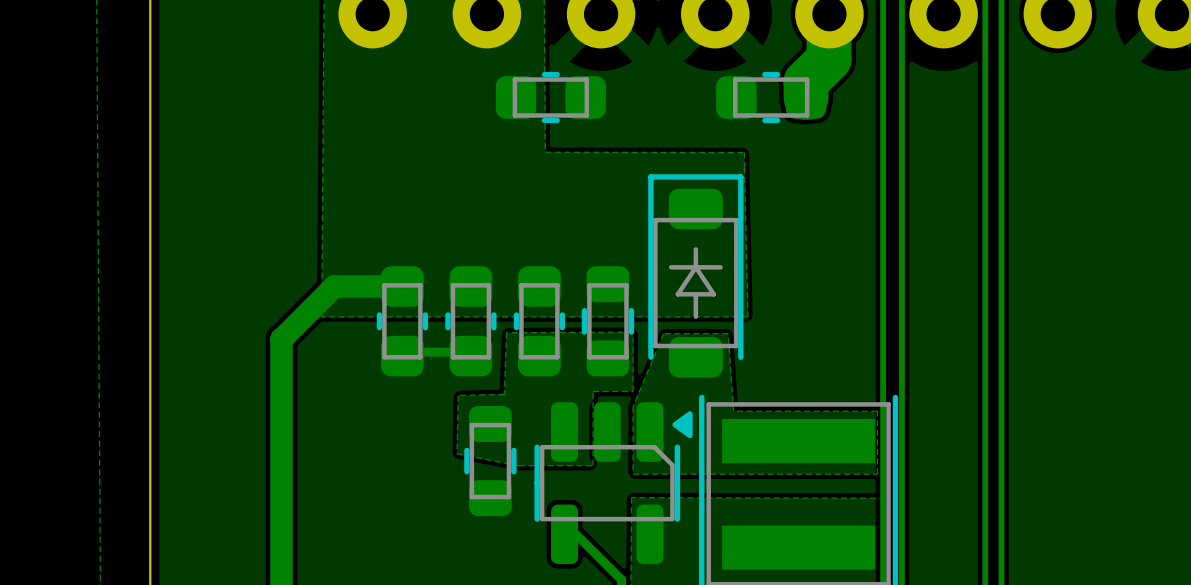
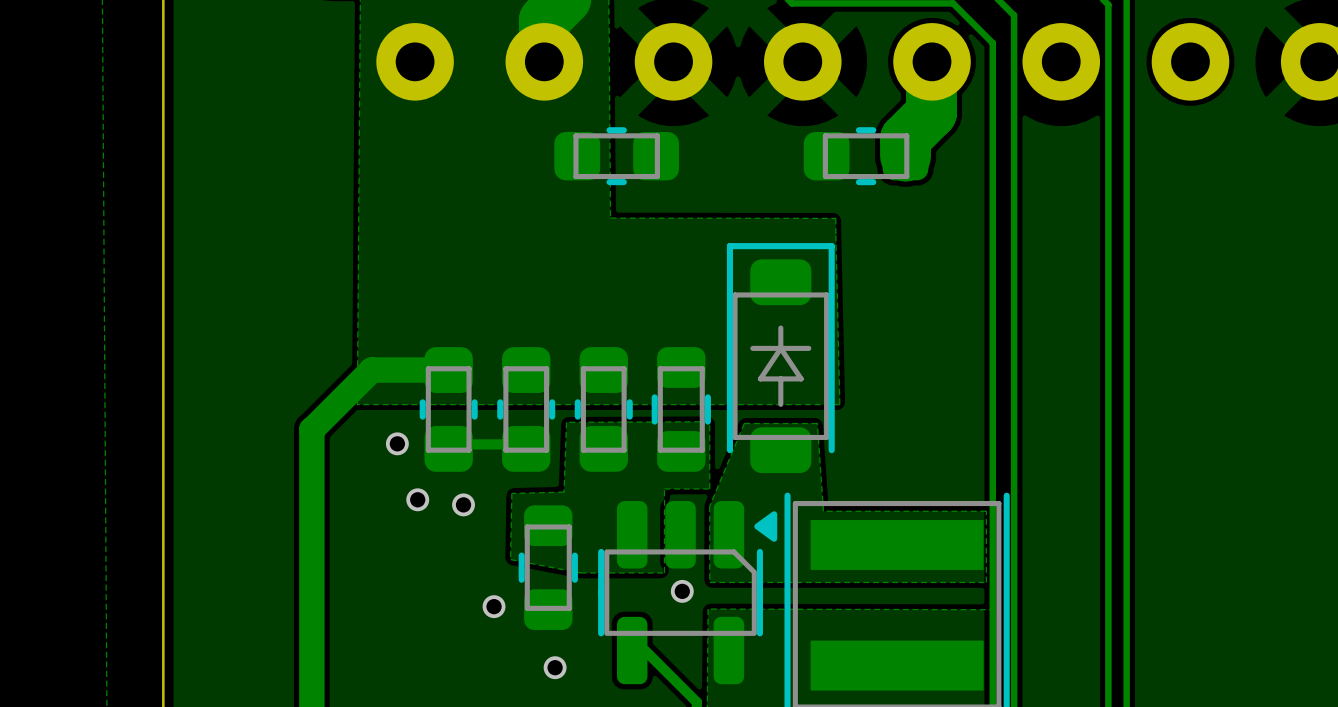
via: none -> (397, 443)
via: none -> (417, 499)
via: none -> (463, 504)
via: none -> (682, 591)
via: none -> (494, 606)
via: none -> (555, 667)

